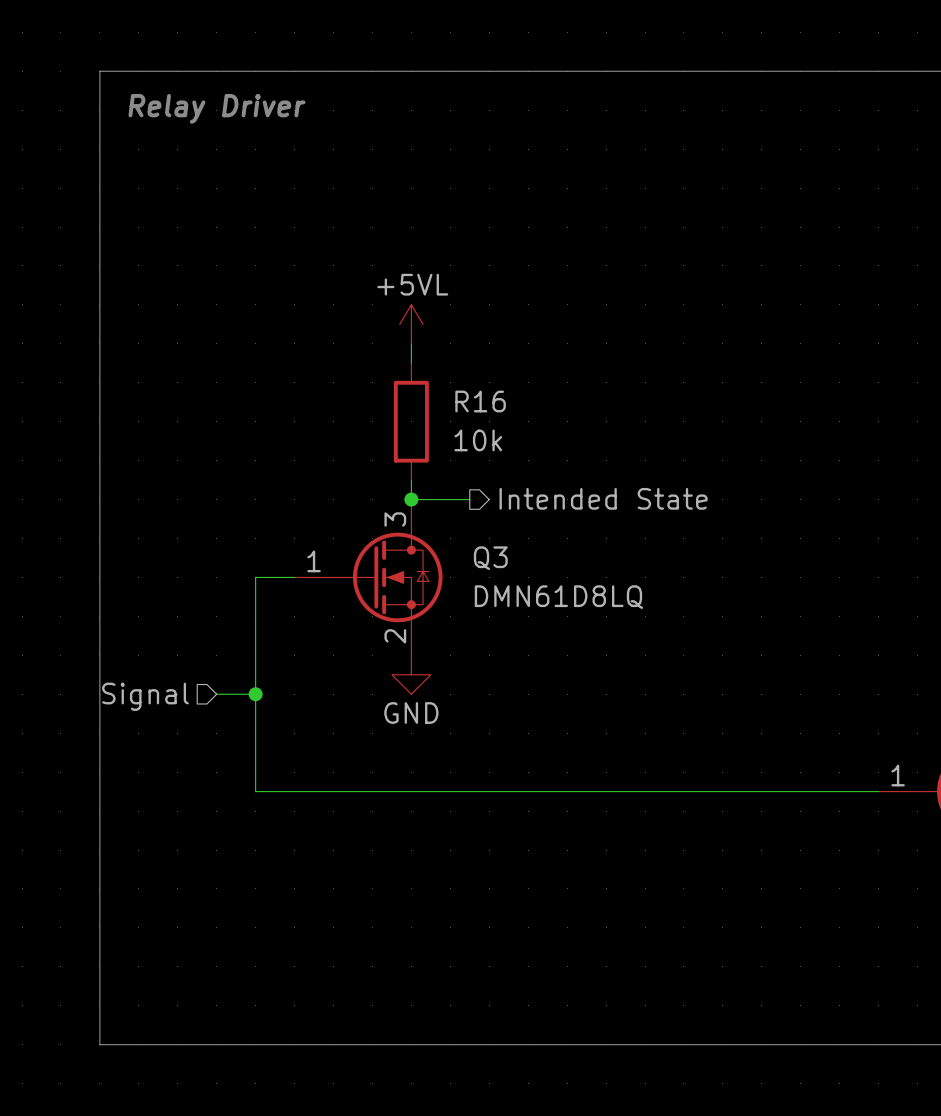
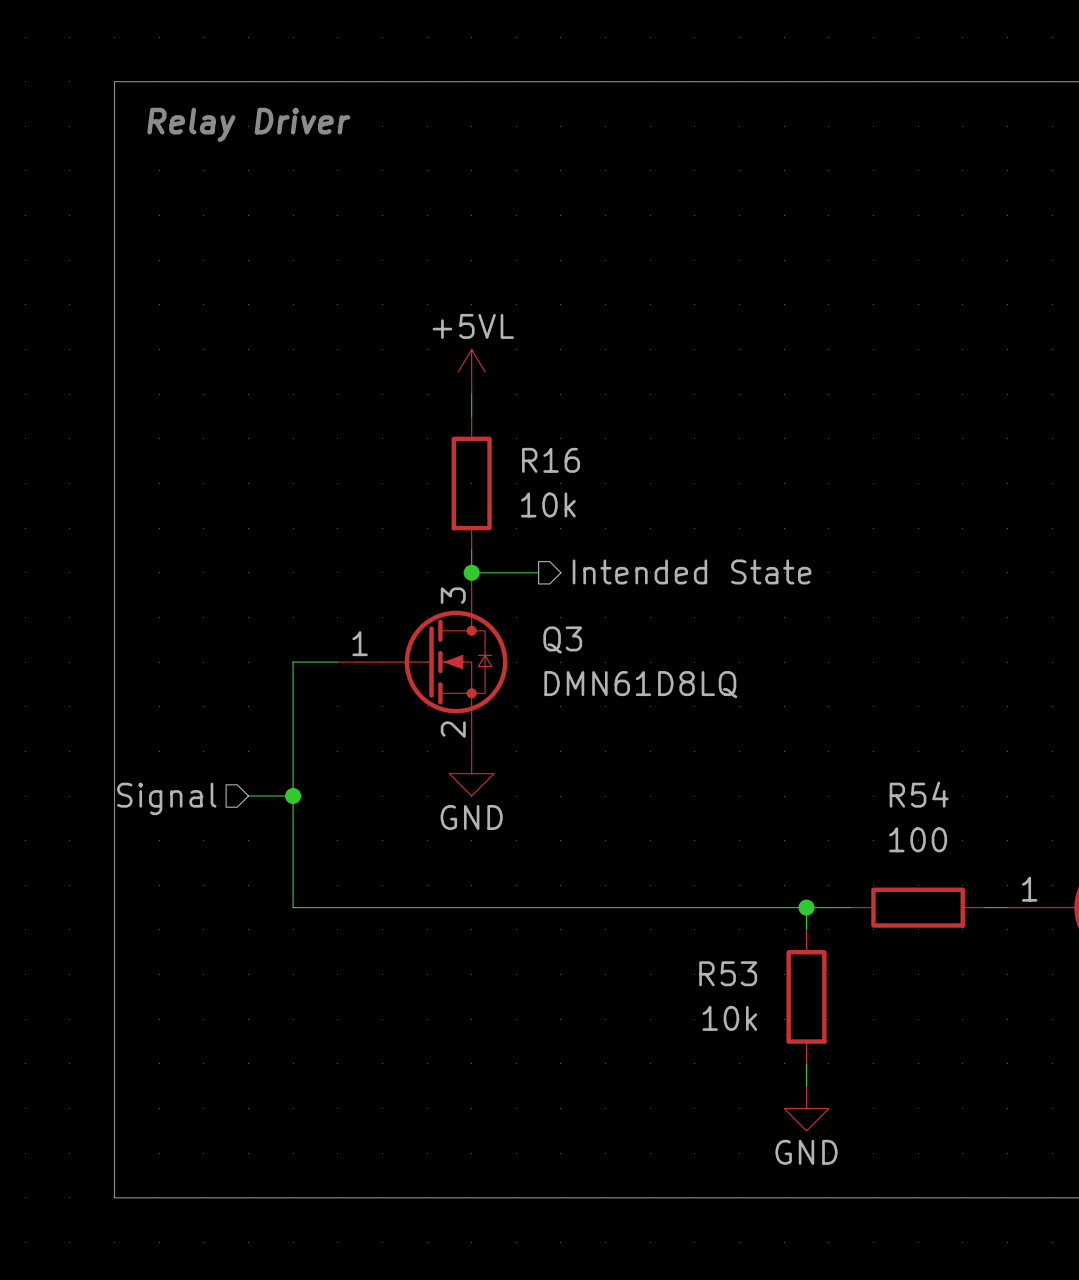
wire: none -> (806, 907) (806, 929)
junction: none -> (806, 907)
wire: (742, 791) (859, 791) -> none
R54: none -> 100 (918, 907)
R53: none -> 10k (806, 996)
wire: none -> (806, 1063) (806, 1086)
power symbol: none -> GND (806, 1108)

